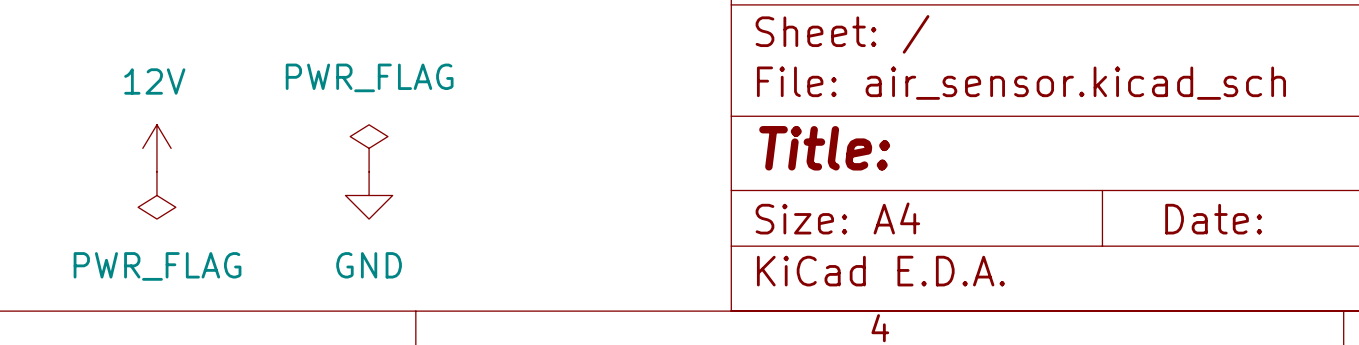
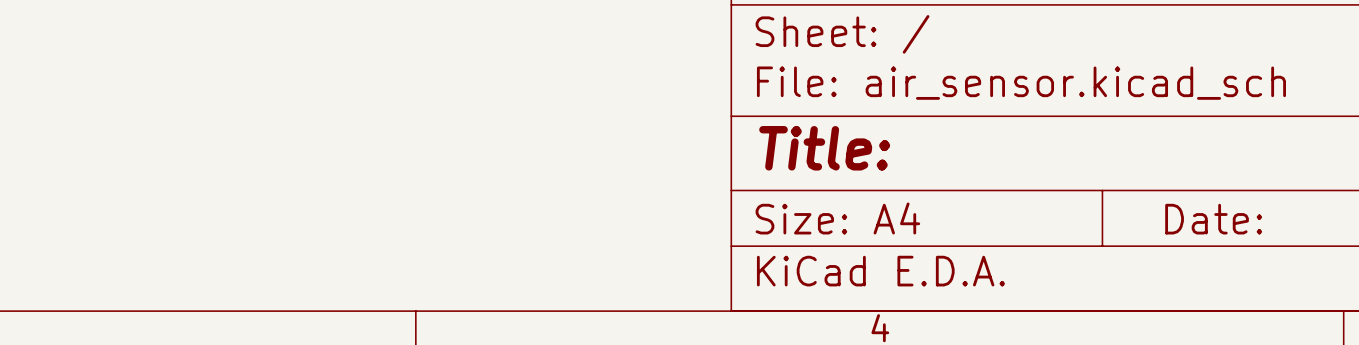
power symbol: 12V (156, 148) -> none
power symbol: PWR_FLAG (369, 148) -> none
power symbol: PWR_FLAG (156, 195) -> none
power symbol: GND (369, 195) -> none

